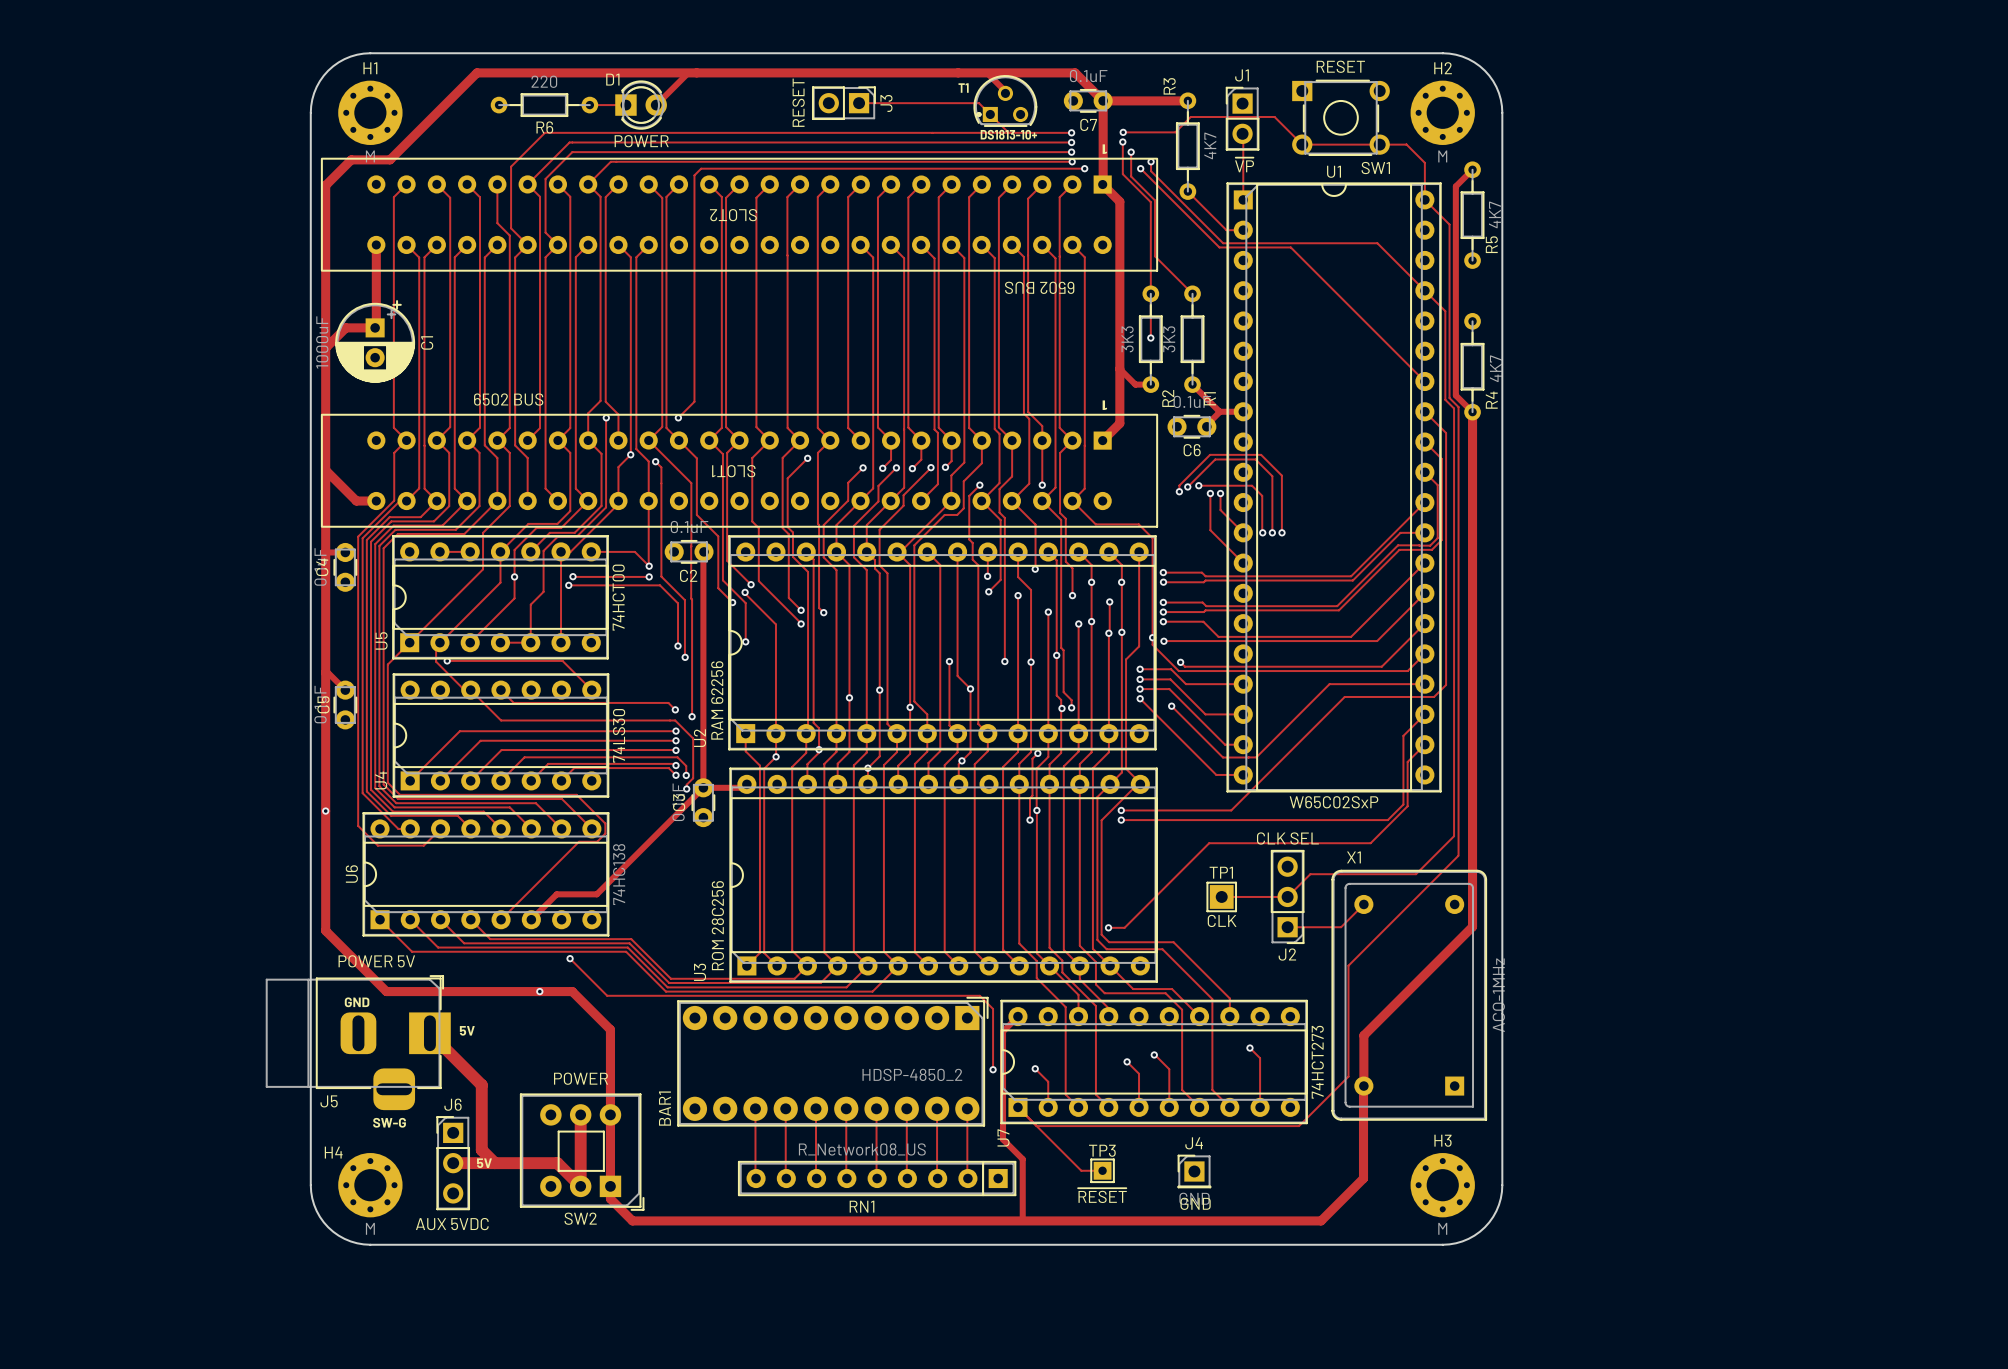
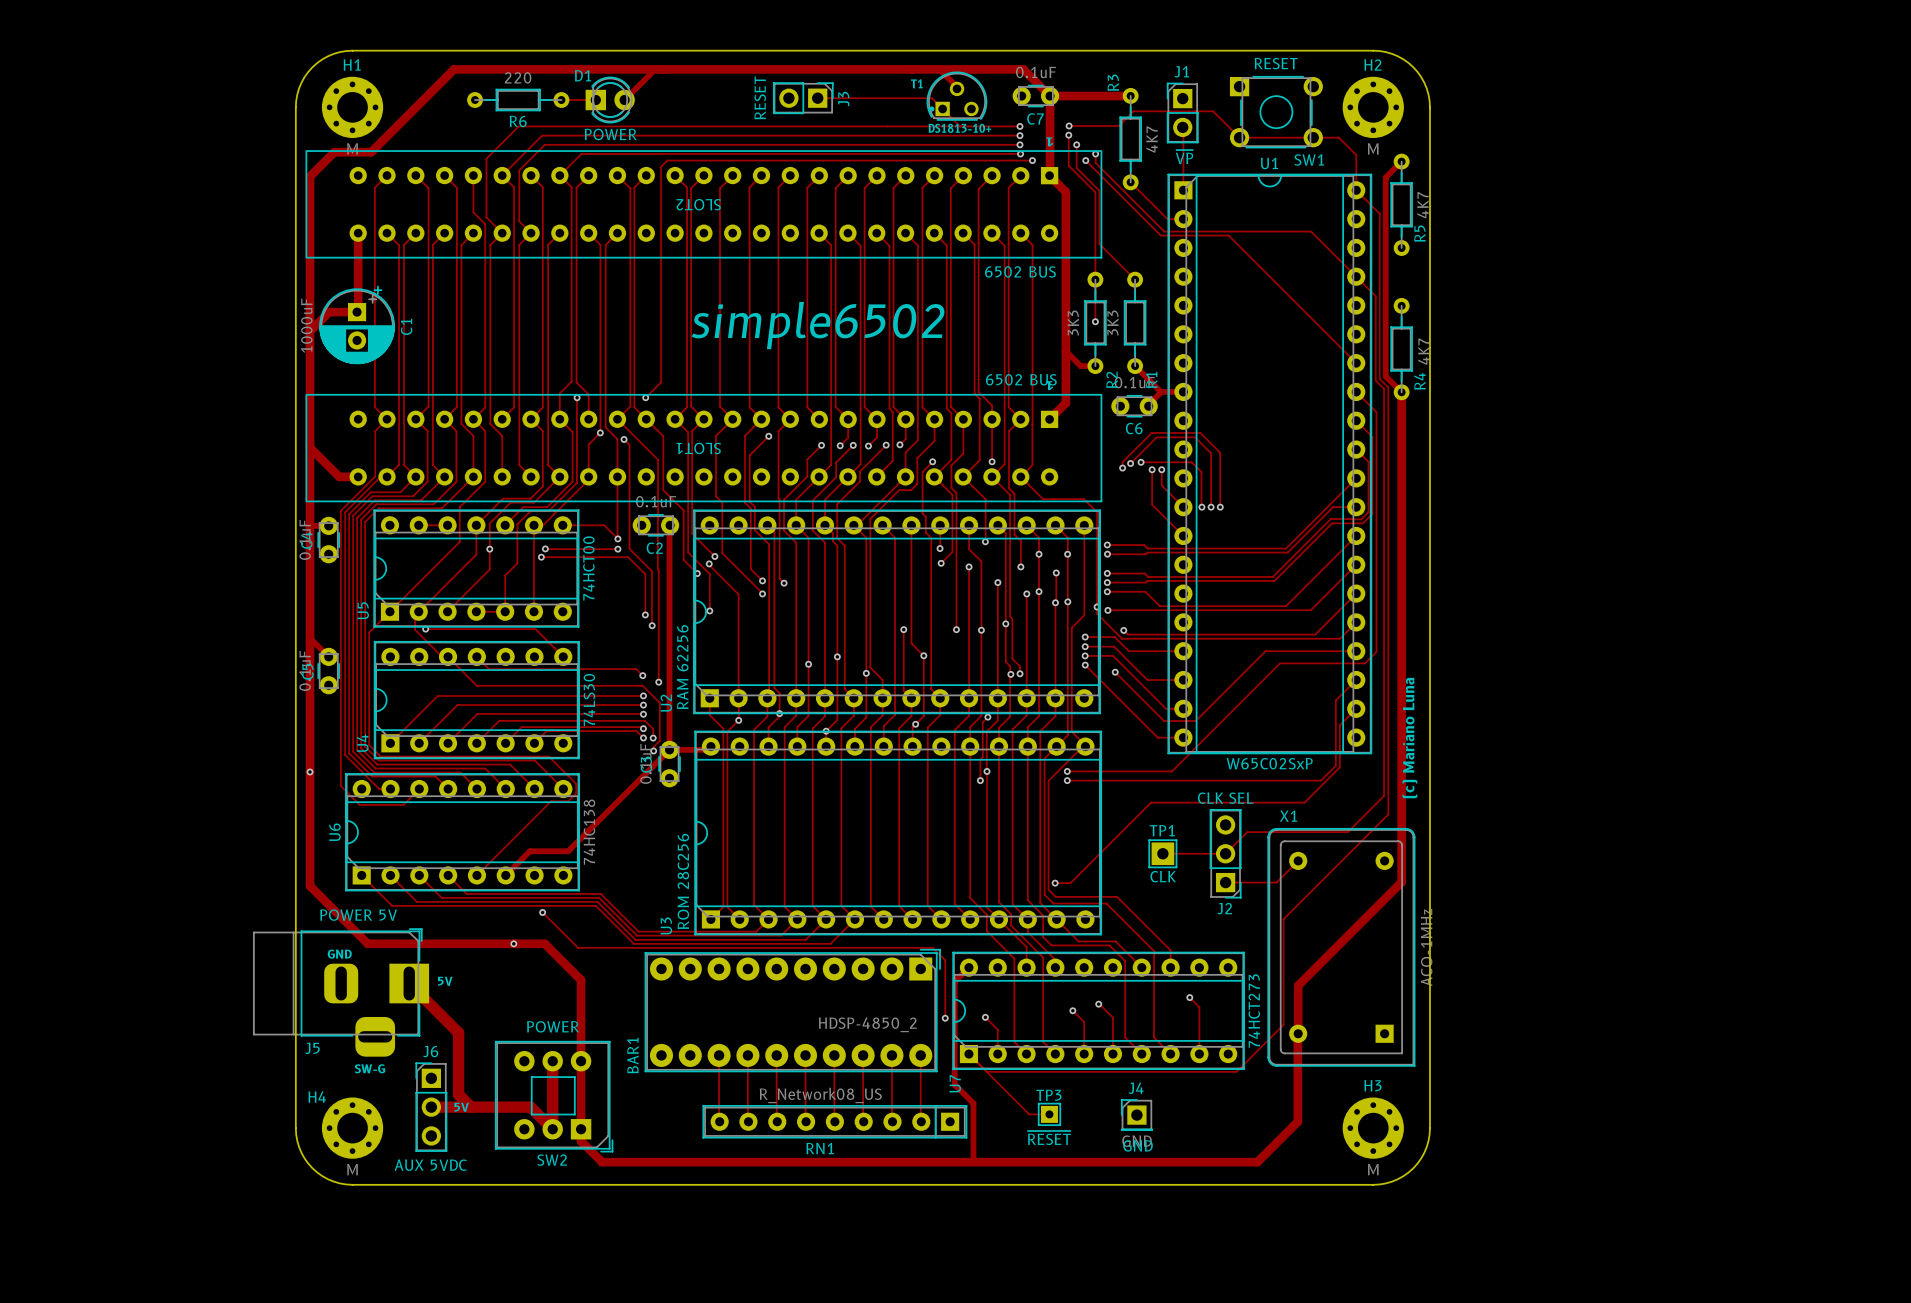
SLOT2 value rotation: 0° (1039, 287) -> 180° (1020, 271)
text: none -> simple6502 (818, 325)
SLOT1 value position: 6502 BUS (508, 399) -> 6502 BUS (1021, 379)
text: none -> (c) Mariano Luna (1409, 737)

